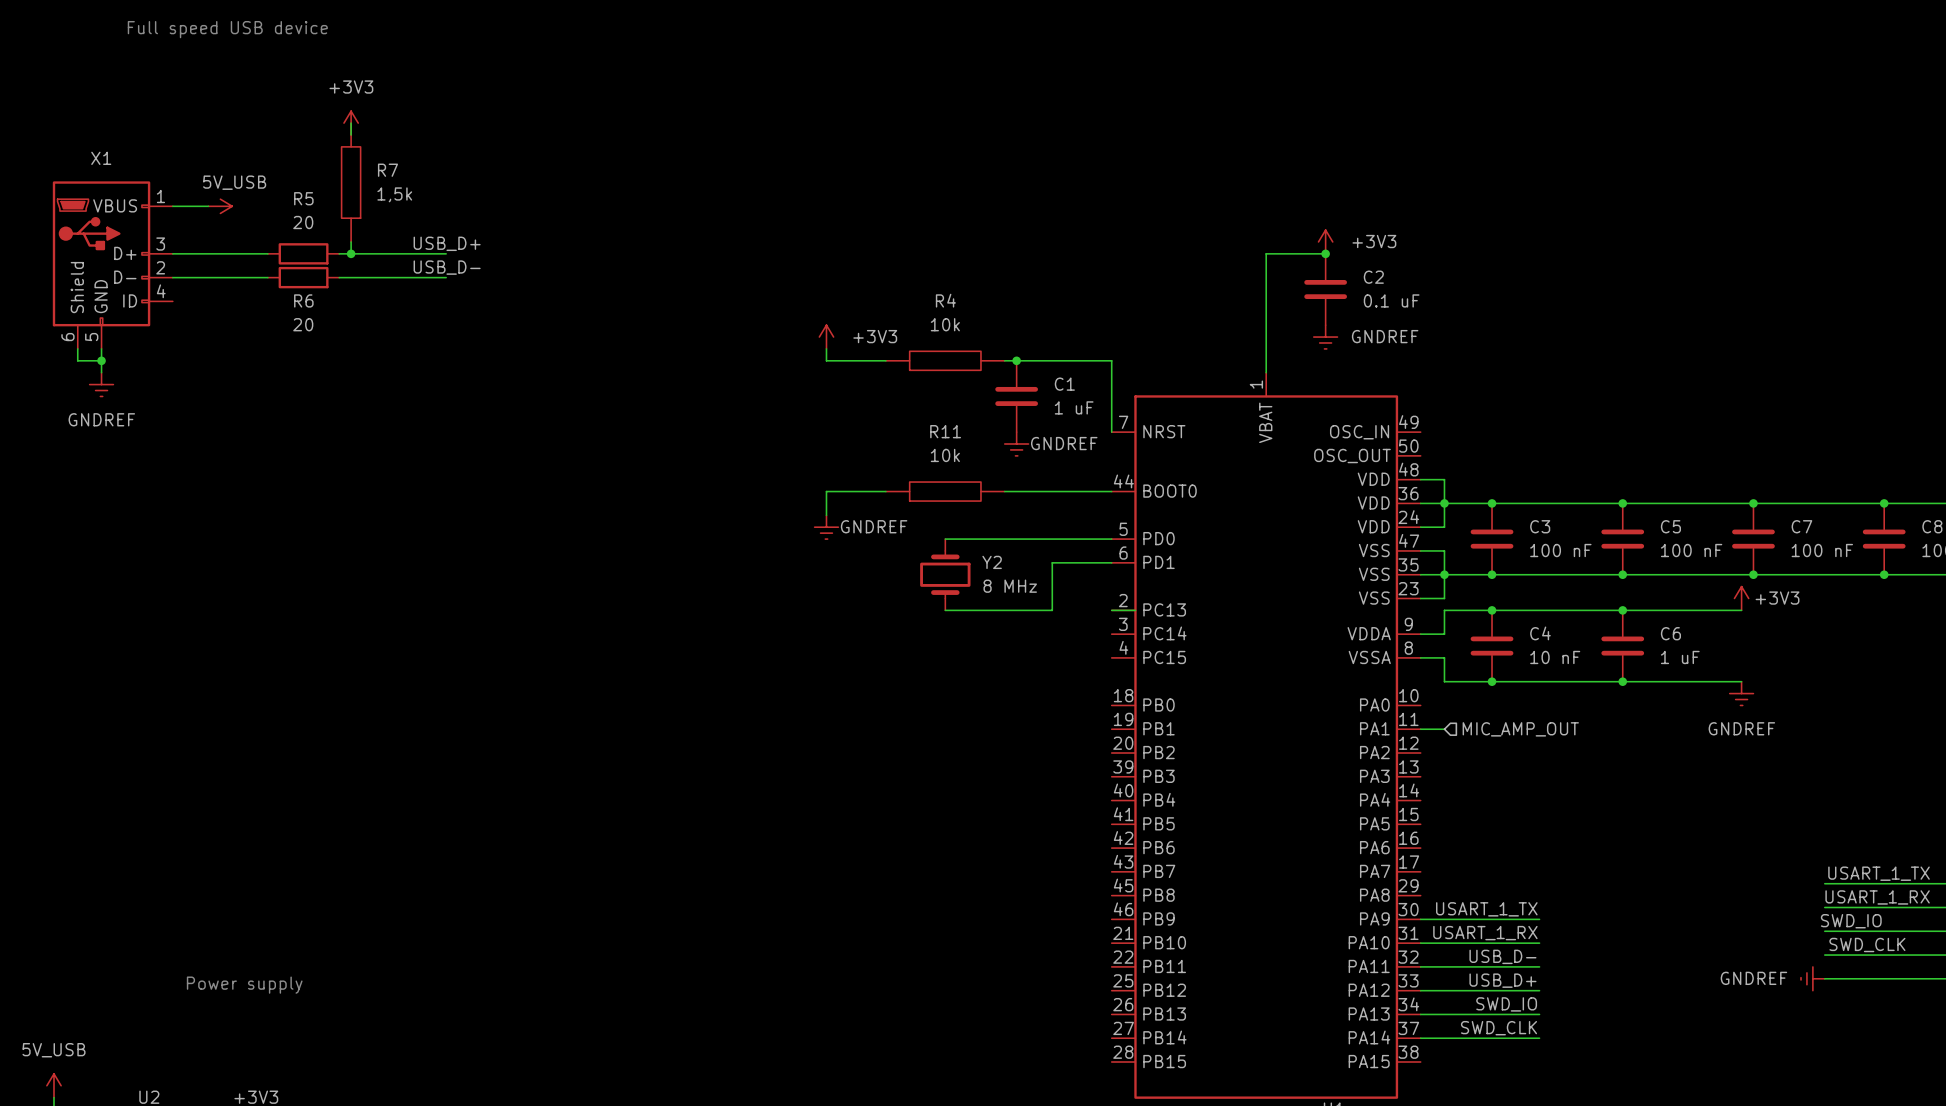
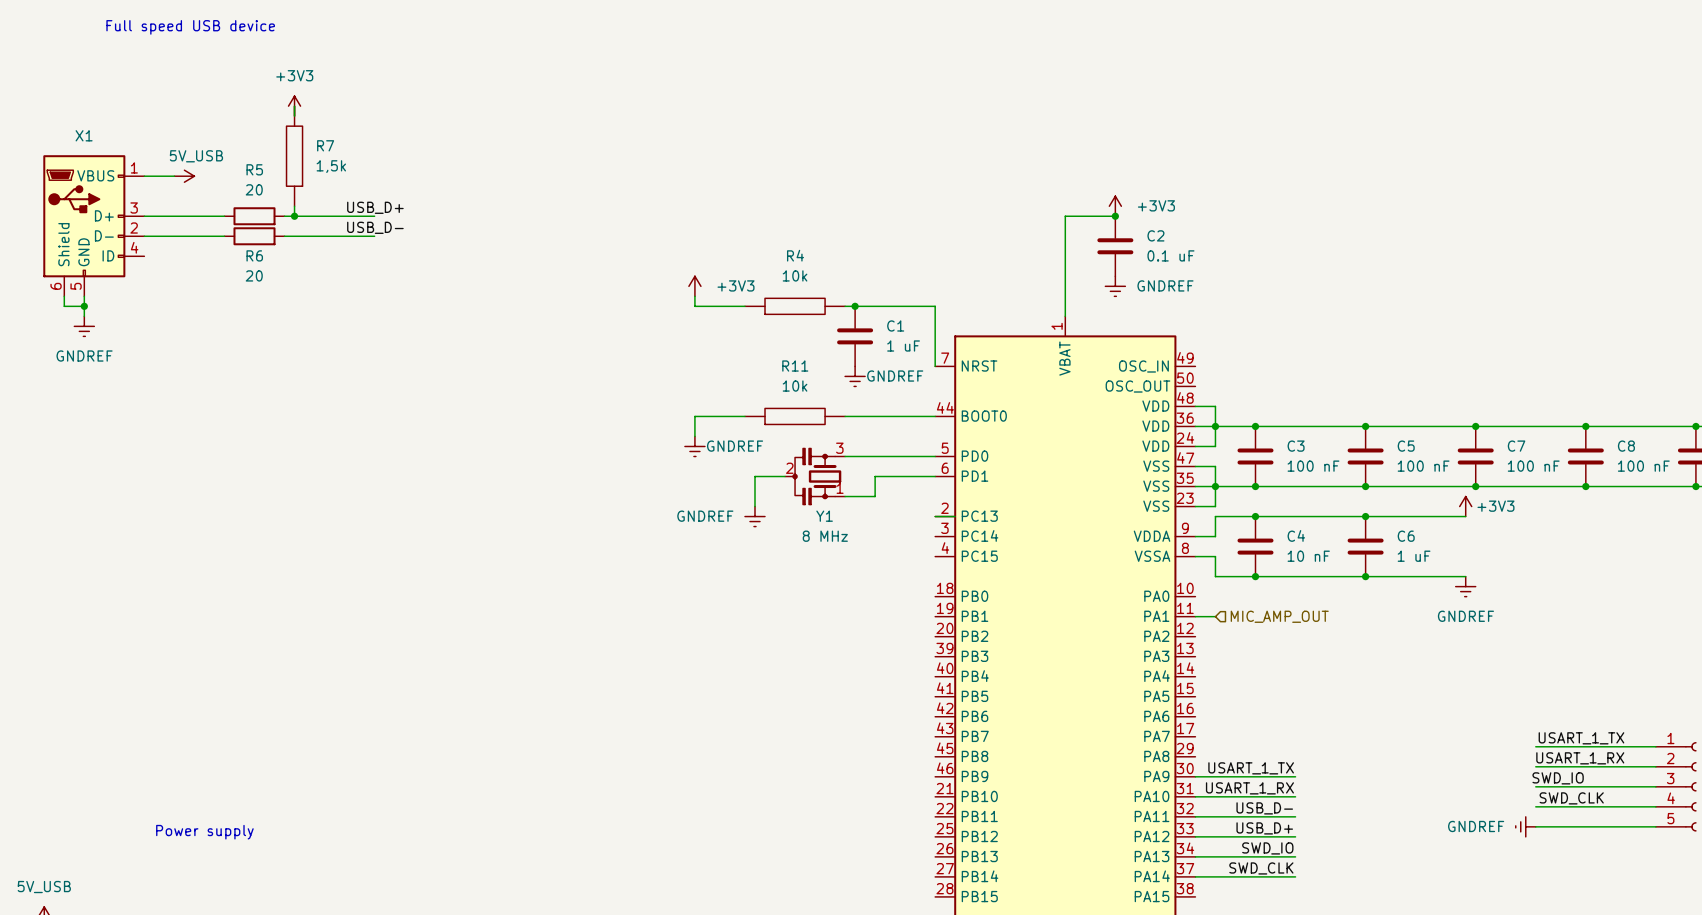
wire: none -> (785, 476) (754, 476) (754, 506)
Y1: none -> 8 MHz (815, 476)
wire: (1052, 562) (1052, 610) (945, 610) -> (885, 476) (875, 476) (875, 496) (845, 496)
Y2: 8 MHz (945, 574) -> none
power symbol: none -> GNDREF (754, 516)

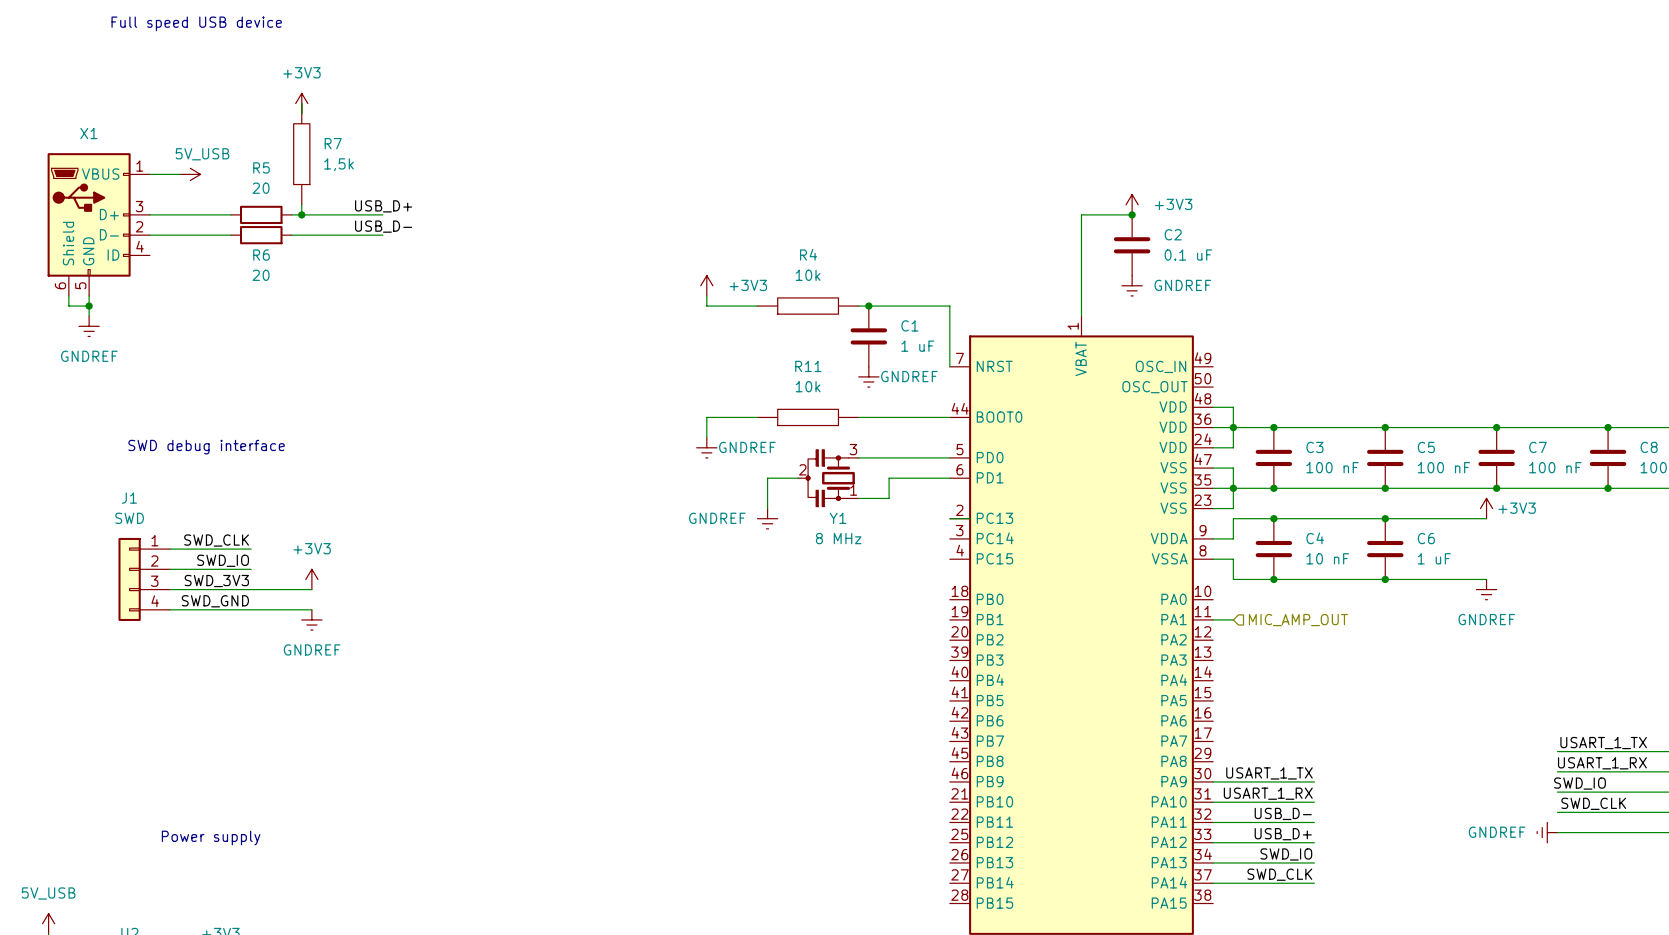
text: none -> SWD debug interface (206, 447)
label: none -> SWD_CLK (216, 540)
wire: none -> (170, 549) (251, 549)
label: none -> SWD_IO (223, 560)
wire: none -> (170, 569) (251, 569)
J1: none -> SWD (144, 579)
power symbol: none -> +3V3 (311, 579)
label: none -> SWD_3V3 (216, 581)
wire: none -> (170, 589) (311, 589)
label: none -> SWD_GND (215, 601)
wire: none -> (170, 609) (311, 609)
power symbol: none -> GNDREF (311, 619)

